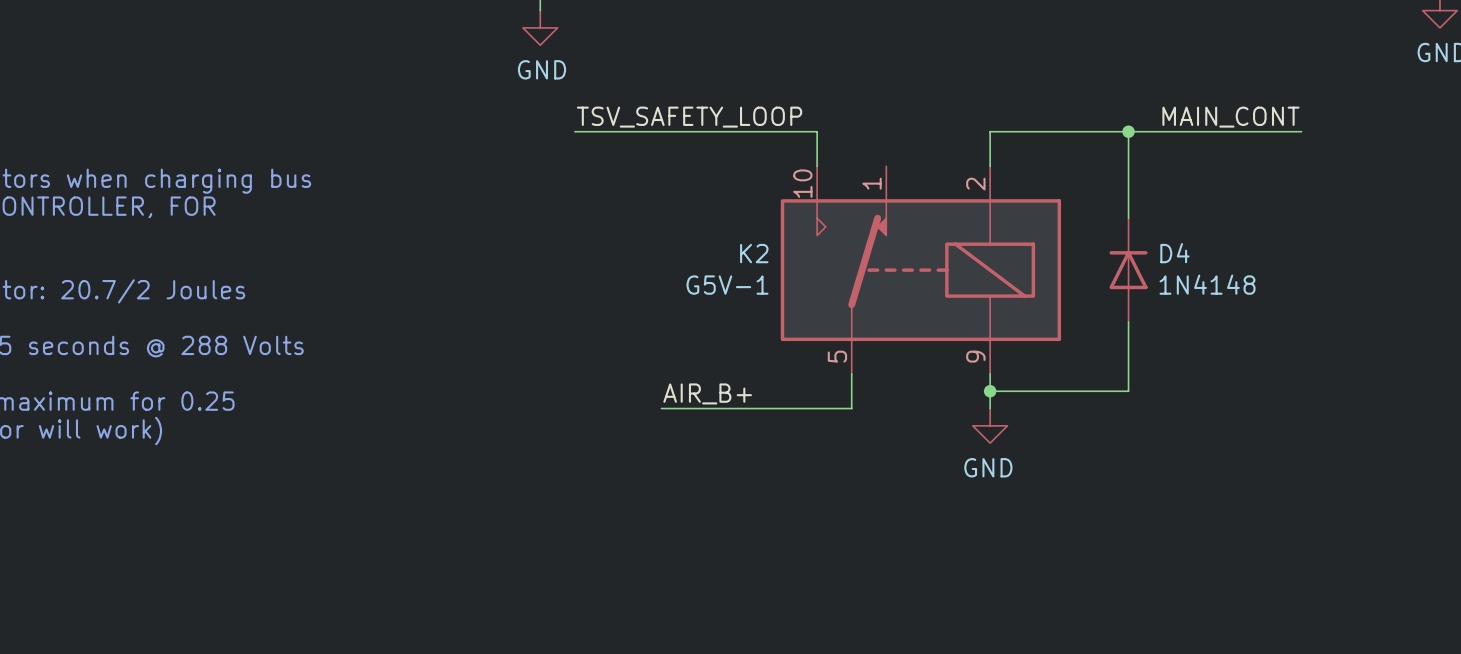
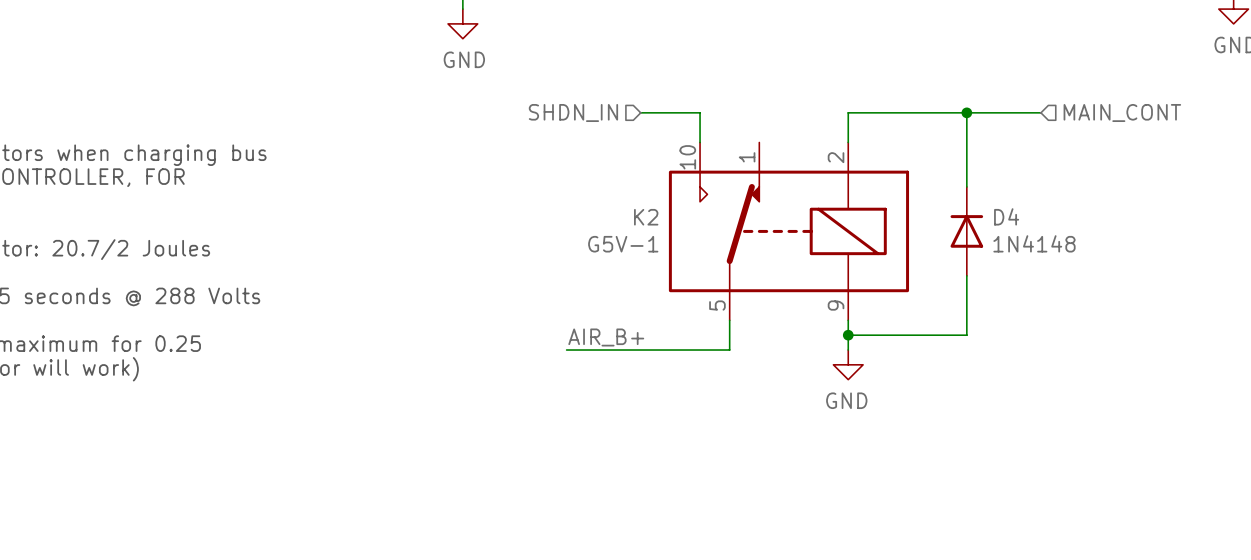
label: TSV_SAFETY_LOOP (689, 117) -> none
label: MAIN_CONT (1230, 117) -> none
wire: (574, 131) (747, 131) -> none
hierarchical label: none -> SHDN_IN (573, 113)
wire: (1215, 131) (1301, 131) -> none
hierarchical label: none -> MAIN_CONT (1122, 113)

